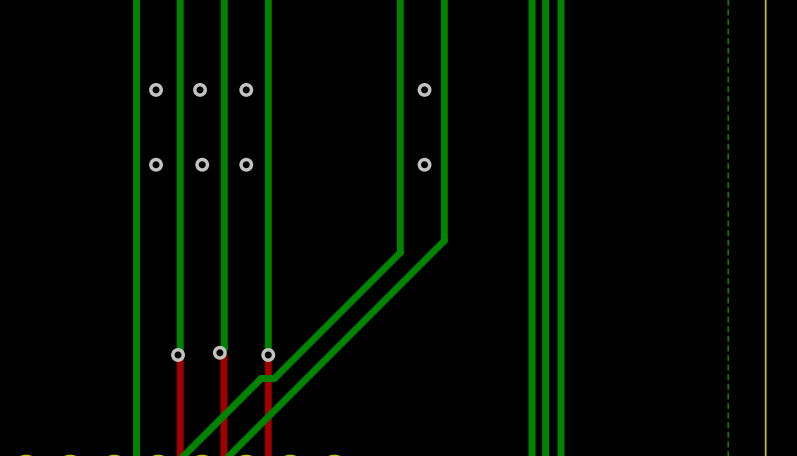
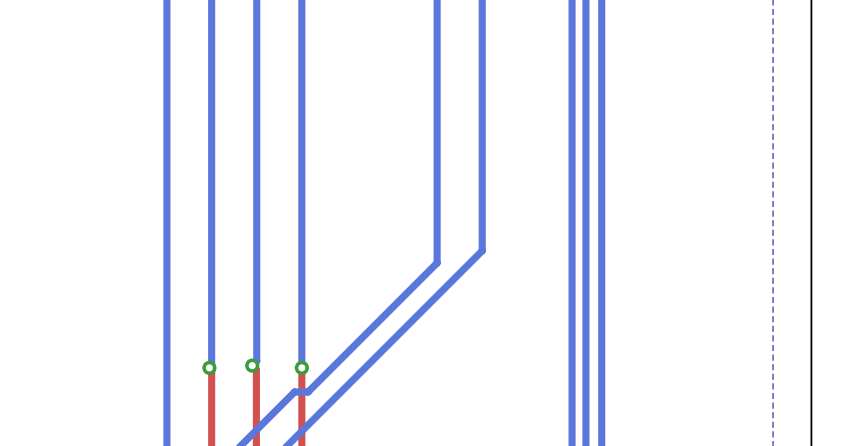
via: (156, 89) -> none
via: (200, 89) -> none
via: (246, 89) -> none
via: (424, 89) -> none
via: (156, 164) -> none
via: (202, 164) -> none
via: (246, 164) -> none
via: (424, 164) -> none

